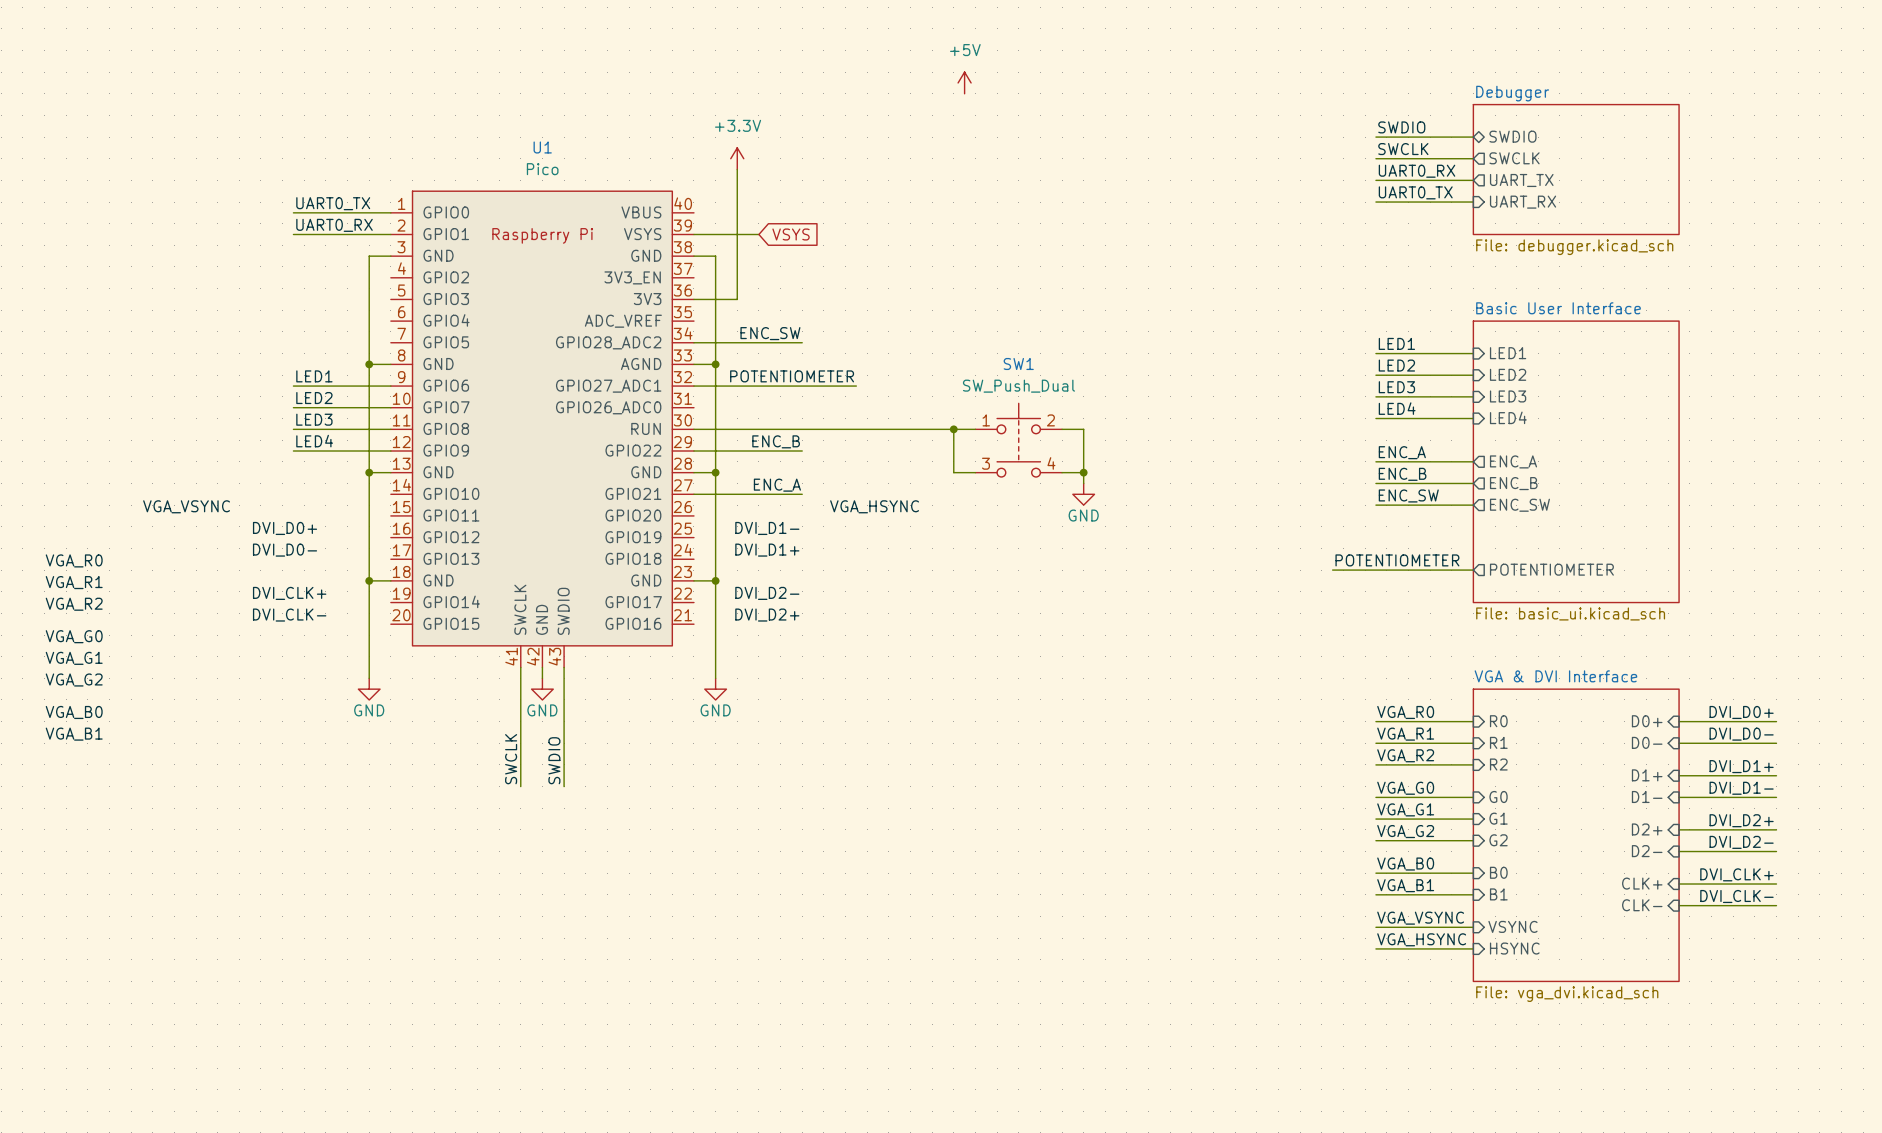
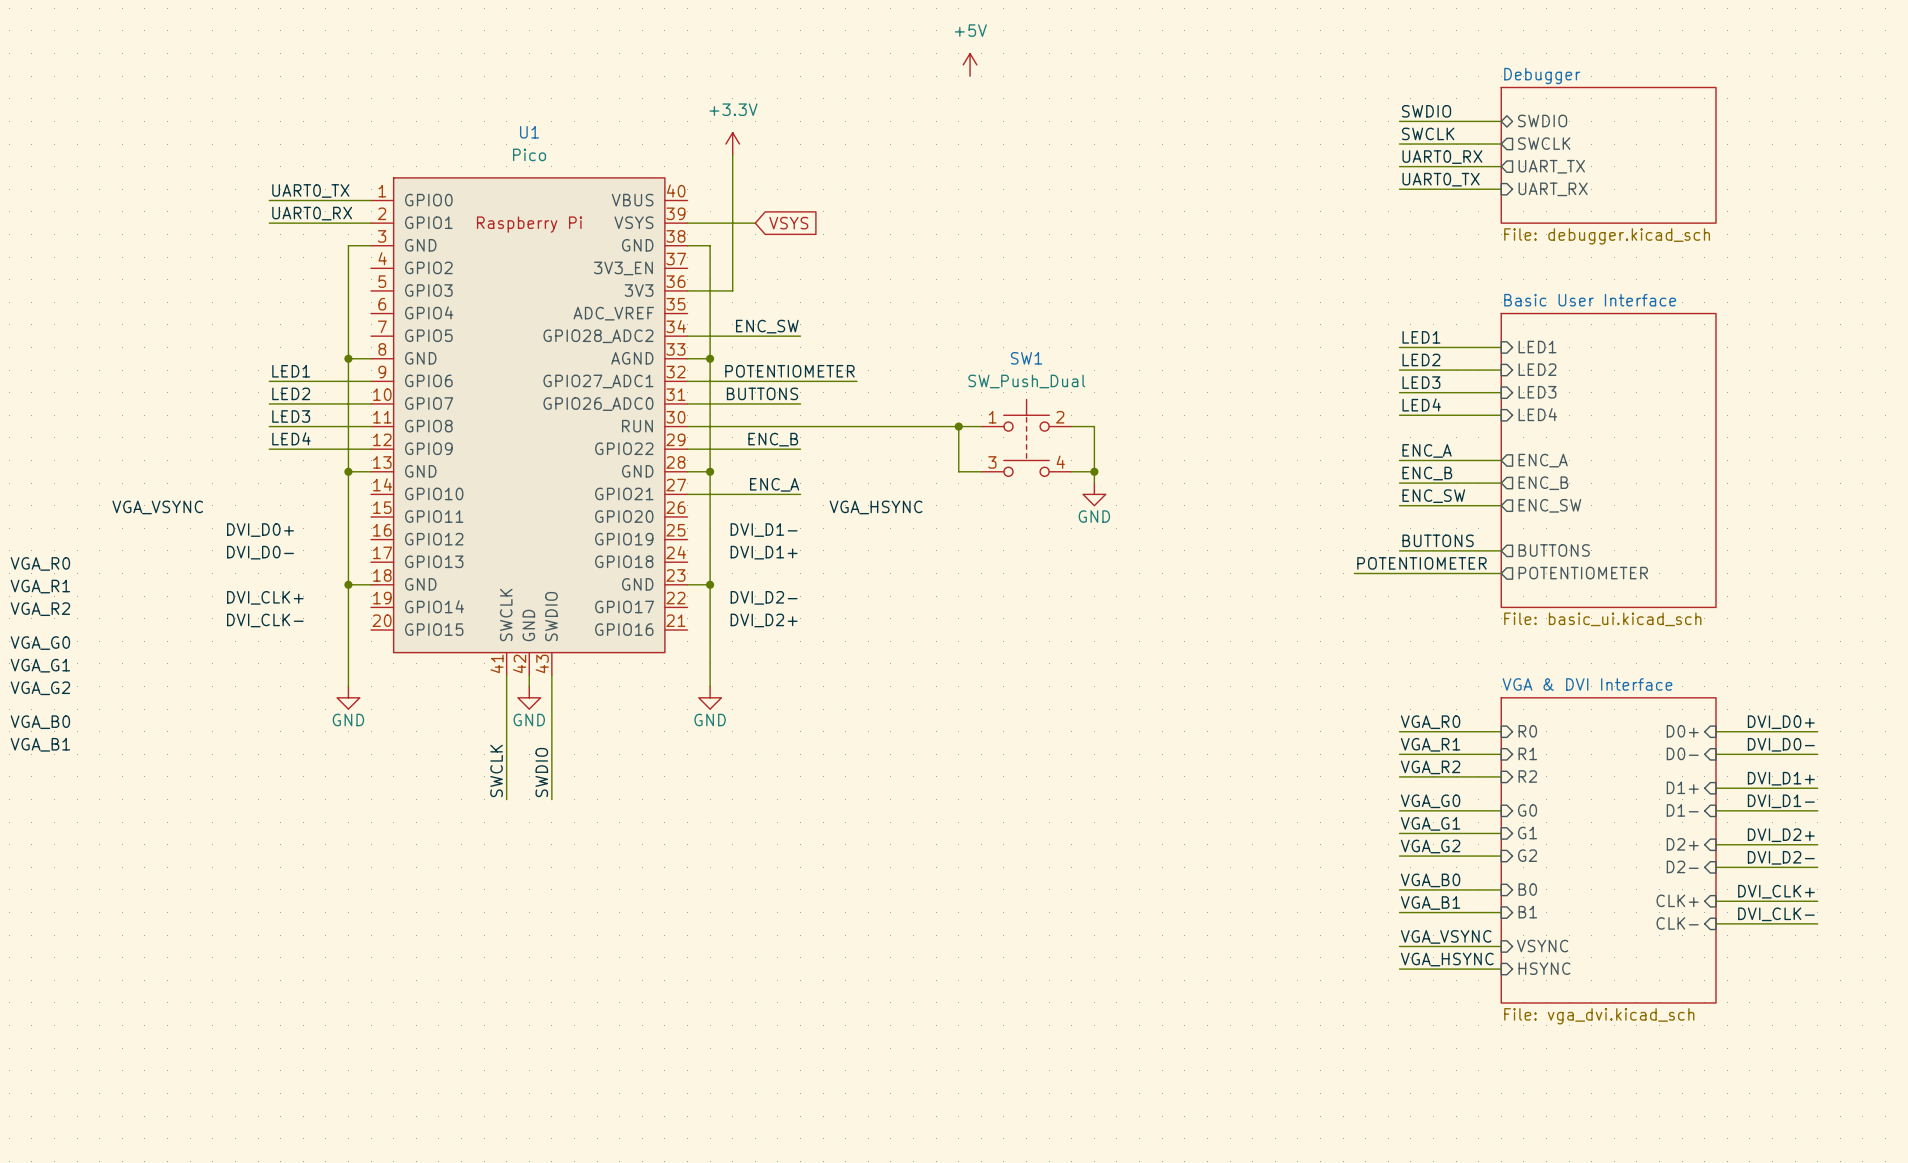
label: none -> BUTTONS (762, 393)
wire: none -> (687, 403) (800, 403)
label: none -> BUTTONS (1438, 540)
wire: none -> (1399, 550) (1501, 550)
sheet pin: none -> BUTTONS (1554, 550)

